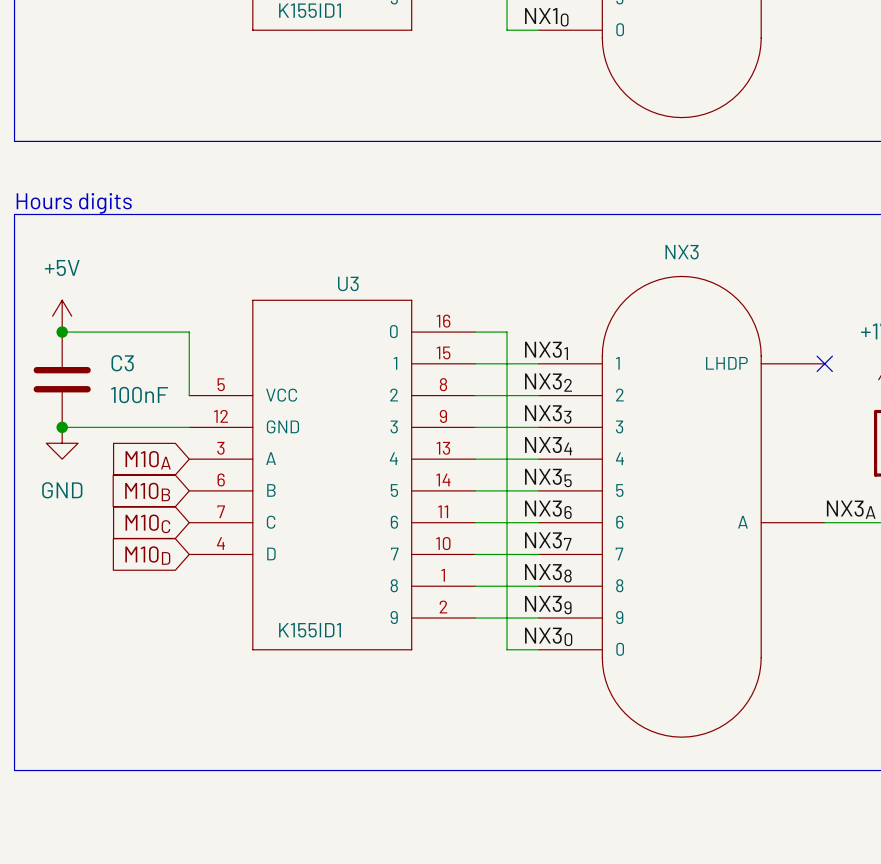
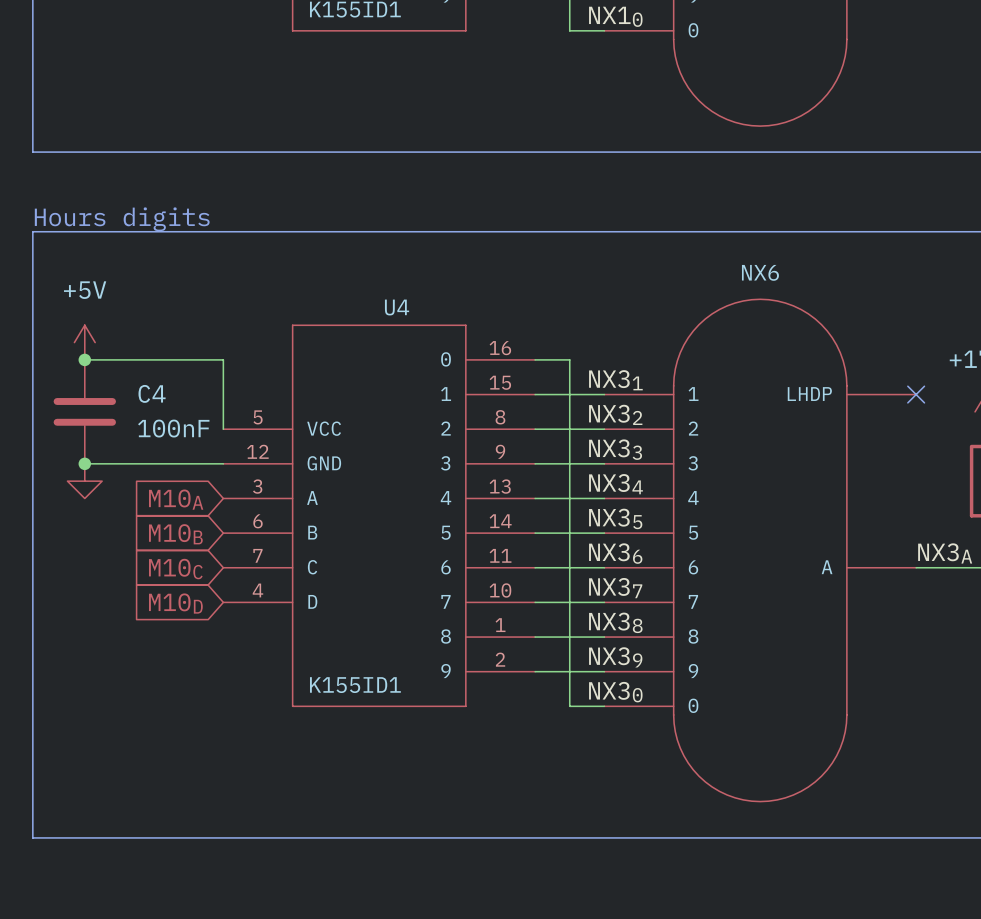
NX3 name: NX3 (682, 252) -> NX6 (760, 272)
U3 name: U3 (348, 283) -> U4 (397, 307)
C3 name: C3 (122, 363) -> C4 (152, 393)
power symbol text: GND (62, 490) -> none

